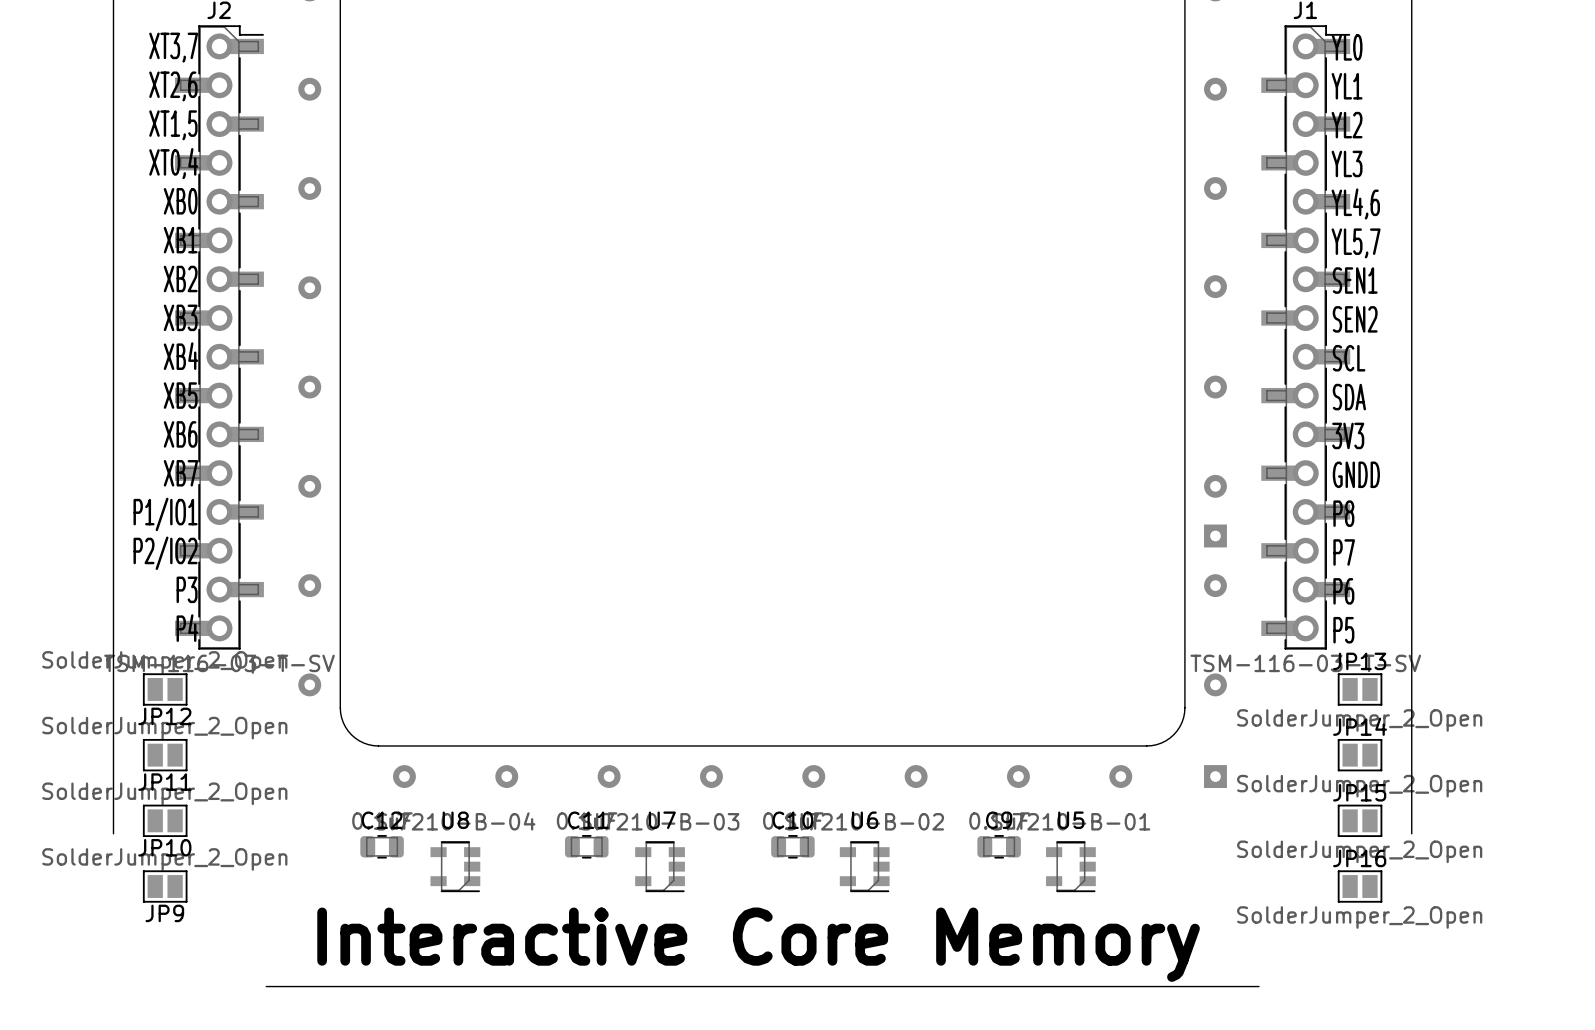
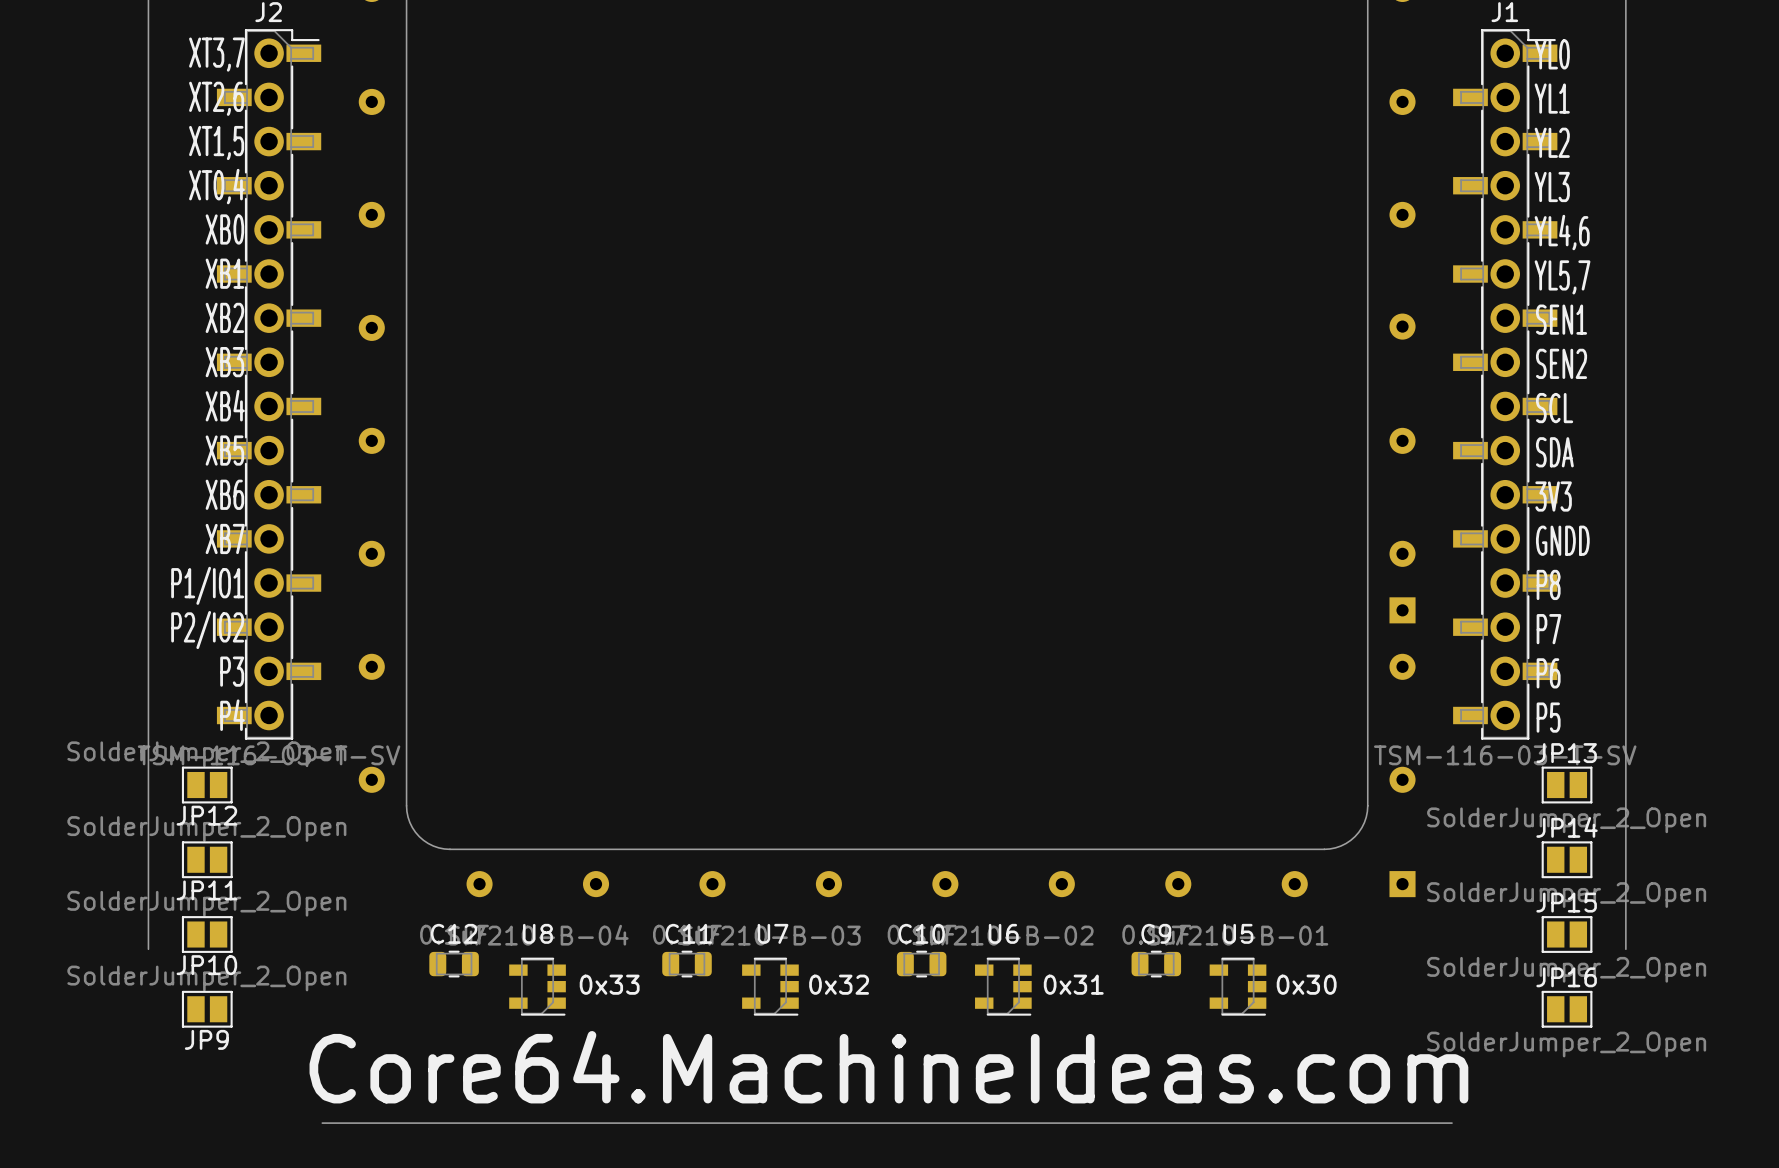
J2 footprint: [175, 25, 264, 650] -> [216, 29, 322, 740]
J1 footprint: [1261, 25, 1351, 650] -> [1453, 29, 1558, 740]
text: none -> 0x33 (609, 984)
text: none -> 0x32 (839, 984)
text: none -> 0x31 (1073, 984)
text: none -> 0x30 (1306, 984)
text: Interactive Core Memory (758, 944) -> Core64.MachineIdeas.com (888, 1067)

